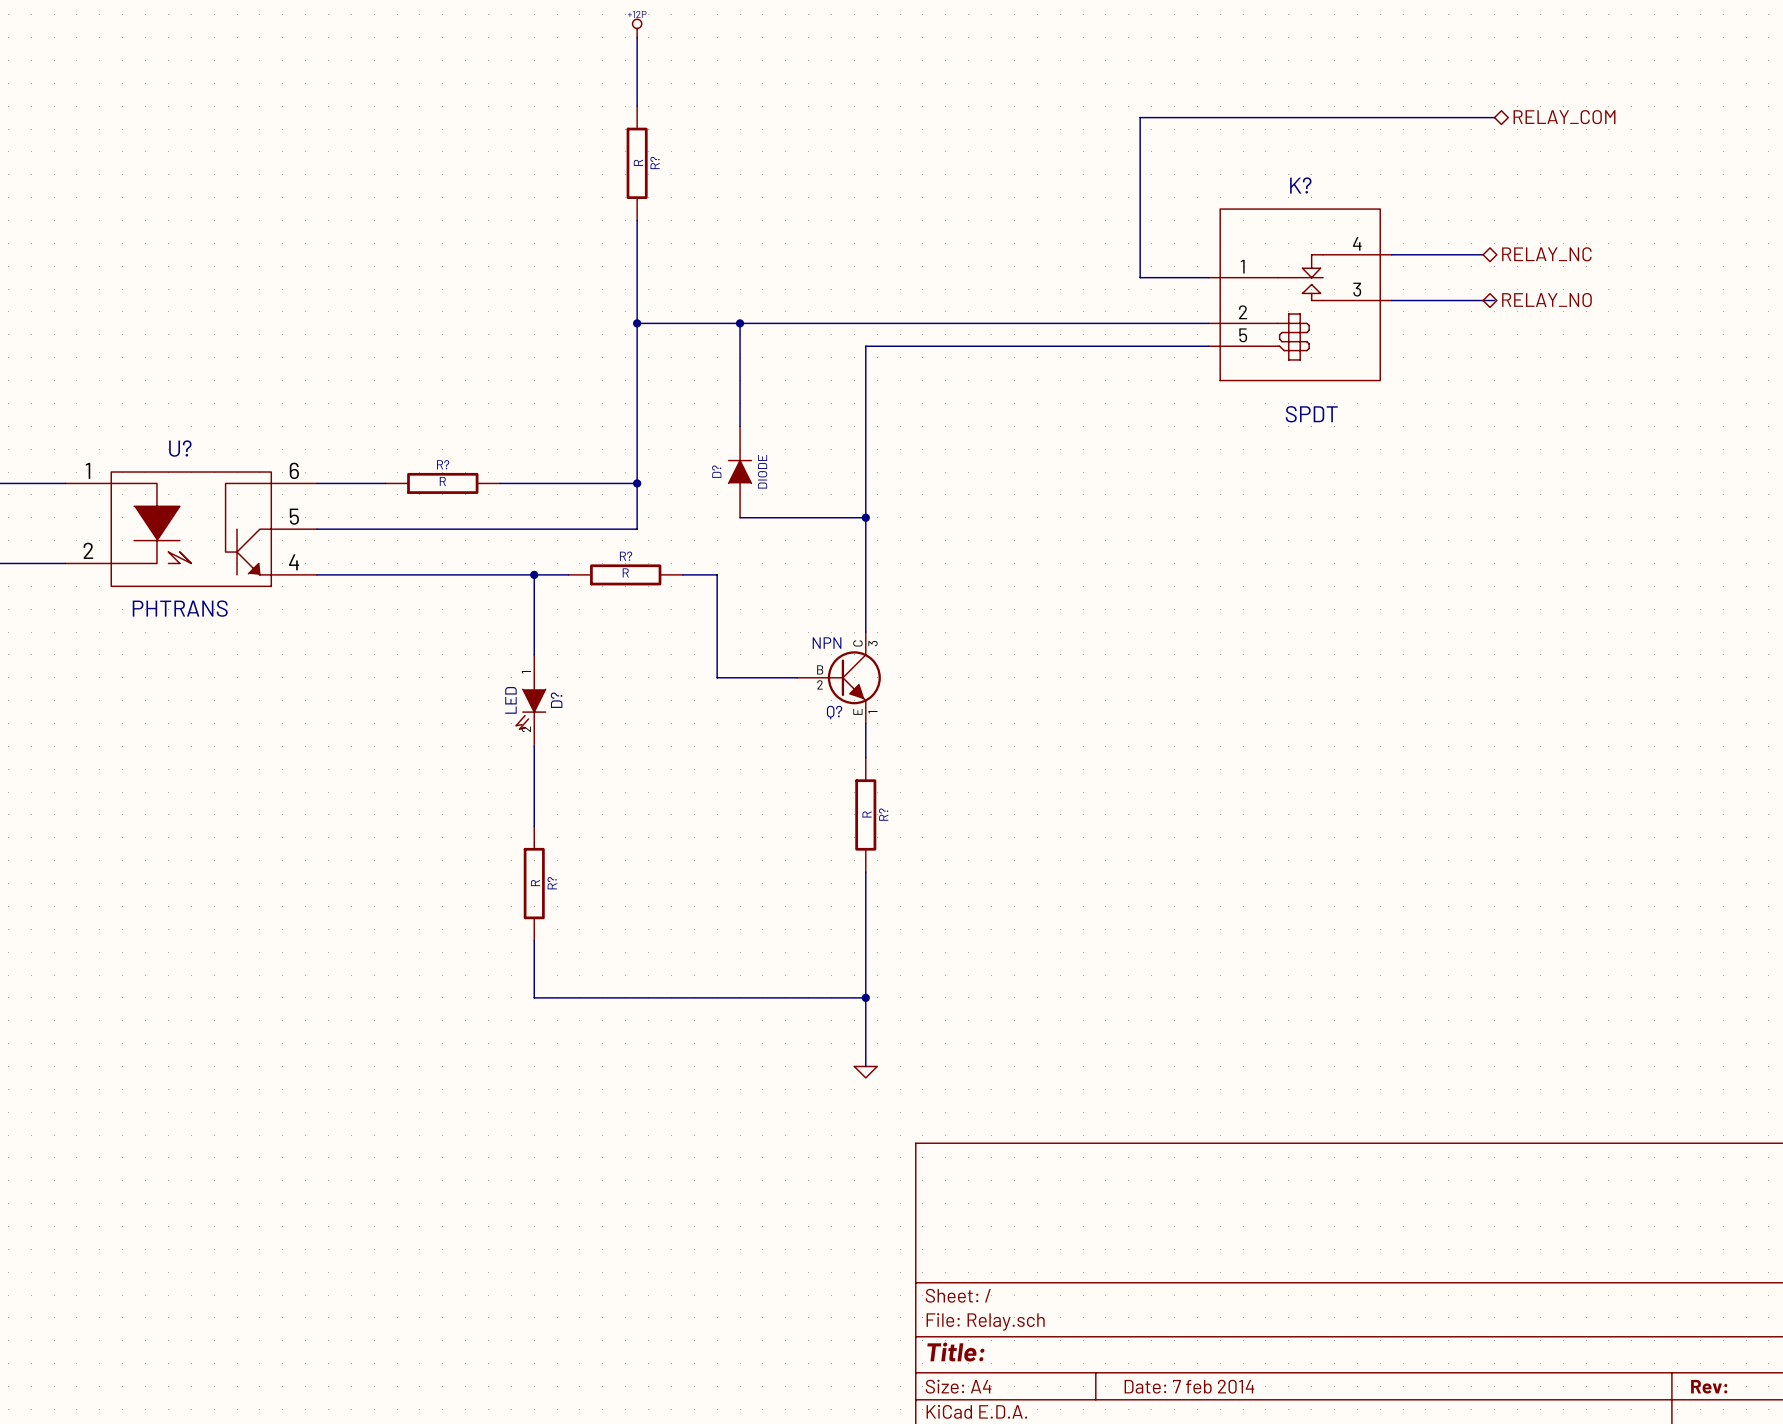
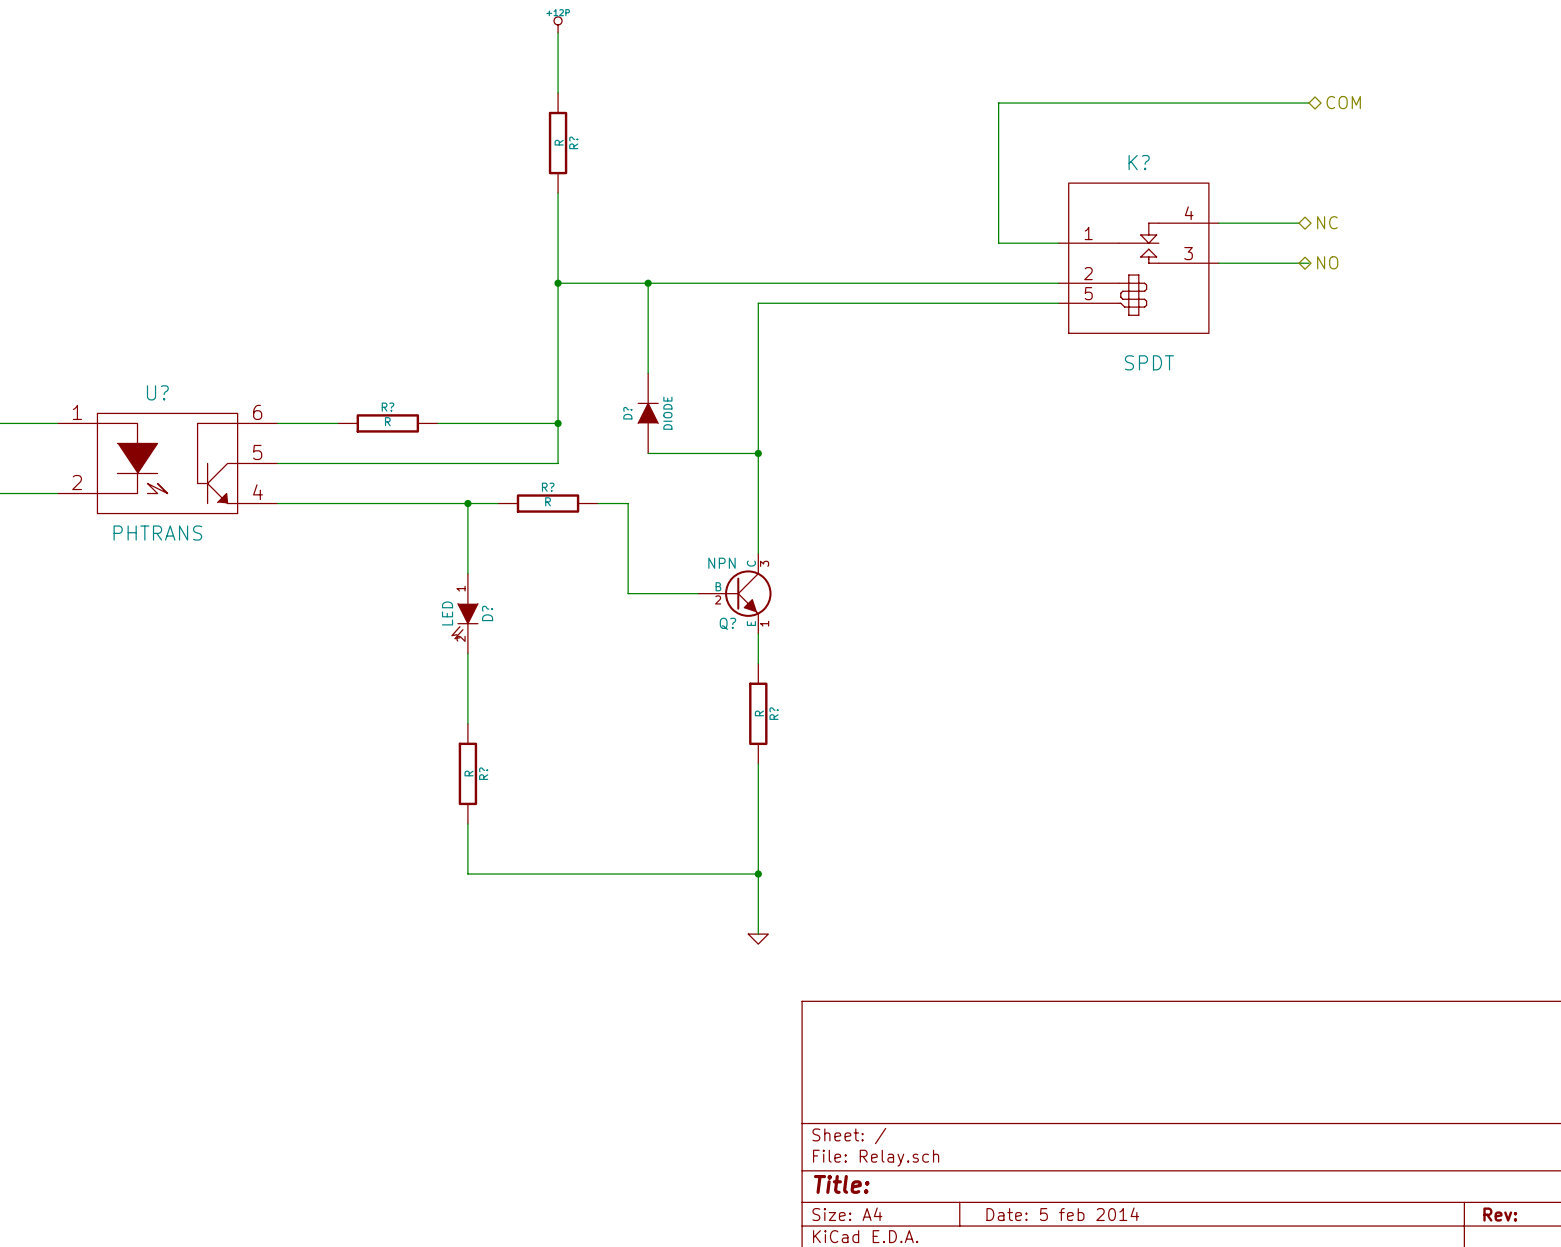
hierarchical label: RELAY_COM (1564, 117) -> COM (1343, 102)
hierarchical label: RELAY_NC (1546, 254) -> NC (1327, 222)
hierarchical label: RELAY_NO (1546, 300) -> NO (1327, 262)
title block: Date: 7 feb 2014 (1189, 1386) -> Date: 5 feb 2014 (1062, 1214)

